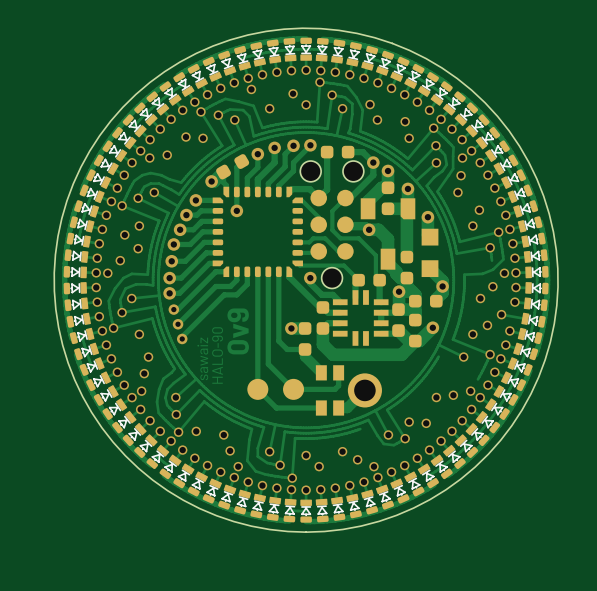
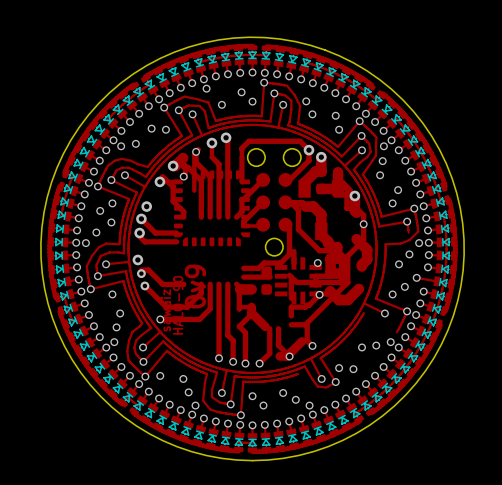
track: (292, 144) (285, 154) (285, 166) (268, 183) (268, 191) -> none
via: (293, 145) -> none
track: (310, 145) (293, 162) -> (287, 141) (249, 141) (241, 150)
via: (310, 145) -> none
track: (274, 147) (274, 162) (257, 179) (257, 191) -> none
track: none -> (227, 137) (227, 217)
track: (327, 152) (327, 189) (318, 198) (309, 189) (292, 189) (289, 191) -> none
part: (337, 152) -> none
track: none -> (196, 151) (196, 162) (210, 176) (210, 217)
via: none -> (196, 151)
part: (232, 166) -> none
track: (257, 167) (247, 177) (247, 191) -> none
track: none -> (211, 157) (219, 164) (219, 217)
track: (293, 170) (278, 185) (278, 191) -> (241, 157) (241, 181)
track: none -> (181, 162) (201, 180) (201, 217)
via: (407, 188) -> none
track: none -> (162, 176) (173, 186) (173, 201) (183, 211) (183, 217)
via: none -> (183, 176)
track: none -> (263, 179) (241, 199) (241, 211) (236, 217)
track: (345, 198) (332, 211) (332, 230) (340, 238) (358, 238) (375, 255) (375, 276) (379, 280) (381, 302) -> none
track: (297, 200) (301, 200) (318, 217) (318, 224) -> (243, 224) (243, 221) (263, 202)
track: none -> (335, 183) (342, 183) (349, 190) (346, 193) (346, 208) (356, 208) (363, 215) (363, 240) (347, 255) (347, 282)
track: (407, 208) (406, 257) -> none
track: (217, 210) (201, 210) (196, 215) (186, 215) -> none
via: (236, 210) -> none
via: (186, 215) -> none
track: (217, 221) (201, 221) (193, 229) (180, 229) -> none
track: none -> (287, 202) (290, 202) (298, 210) (298, 229) (319, 250) (330, 250)
via: (369, 229) -> none
track: (217, 231) (202, 231) (190, 244) (173, 244) -> none
track: (217, 242) (204, 242) (185, 261) (171, 261) -> none
track: (297, 242) (309, 242) (313, 238) (325, 238) (338, 251) (345, 251) -> (243, 268) (258, 268) (264, 263) (280, 263) (289, 254) (289, 228) (285, 224)
track: none -> (143, 220) (155, 233) (176, 233)
via: none -> (363, 224)
track: (217, 252) (206, 252) (181, 278) (169, 278) -> none
part: (430, 252) -> none
track: (217, 263) (209, 263) (179, 293) (169, 293) -> none
track: (297, 263) (299, 265) (344, 265) (358, 280) -> none
track: none -> (139, 236) (144, 241) (176, 241)
part: (406, 267) -> none
track: (226, 271) (215, 271) (178, 309) (173, 309) -> none
track: (236, 271) (236, 280) (230, 286) (215, 286) (178, 324) -> none
track: (247, 271) (247, 284) (236, 294) (224, 294) (182, 338) -> none
track: (257, 271) (257, 389) (276, 408) (321, 408) -> none
track: (268, 271) (268, 364) (293, 389) (334, 389) (338, 385) (338, 372) -> none
track: (278, 271) (278, 341) (287, 349) (292, 349) -> (236, 284) (239, 286) (239, 308) (241, 307)
track: (289, 271) (289, 277) (319, 307) (322, 307) (328, 312) (340, 312) -> none
via: (169, 278) -> none
track: (310, 278) (310, 283) (321, 294) (332, 294) (340, 302) -> none
via: (310, 278) -> none
part: (369, 280) -> none
via: (442, 286) -> none
via: (399, 291) -> none
via: none -> (317, 263)
part: (425, 301) -> none
track: none -> (141, 270) (148, 270) (162, 284) (183, 284)
track: none -> (289, 275) (296, 282) (347, 282)
track: none -> (243, 277) (270, 277)
track: none -> (291, 277) (291, 298)
part: (398, 320) -> none
track: none -> (347, 282) (305, 324) (291, 324)
track: none -> (201, 284) (201, 293) (187, 307) (166, 307) (143, 284)
track: none -> (210, 284) (210, 308) (199, 319) (160, 319)
track: none -> (219, 284) (219, 358)
track: none -> (227, 284) (227, 335) (233, 340) (233, 361)
track: (340, 323) (328, 323) (322, 328) (322, 344) (333, 354) (401, 354) (415, 341) -> none
via: (432, 327) -> none
via: (291, 328) -> none
part: (415, 330) -> none
track: none -> (319, 294) (305, 307) (291, 307) (291, 315)
via: none -> (319, 294)
via: (182, 338) -> none
part: (305, 338) -> none
track: none -> (256, 315) (249, 315) (239, 326) (245, 332) (245, 363)
via: none -> (160, 319)
track: none -> (307, 323) (307, 340) (312, 345)
track: none -> (269, 328) (269, 353) (259, 363)
track: none -> (278, 328) (278, 345) (289, 356)
part: (257, 389) -> none
part: (293, 389) -> none
part: (348, 390) -> none
via: none -> (312, 345)
via: none -> (289, 356)
via: none -> (219, 358)
via: none -> (233, 361)
via: none -> (245, 363)
via: none -> (259, 363)

